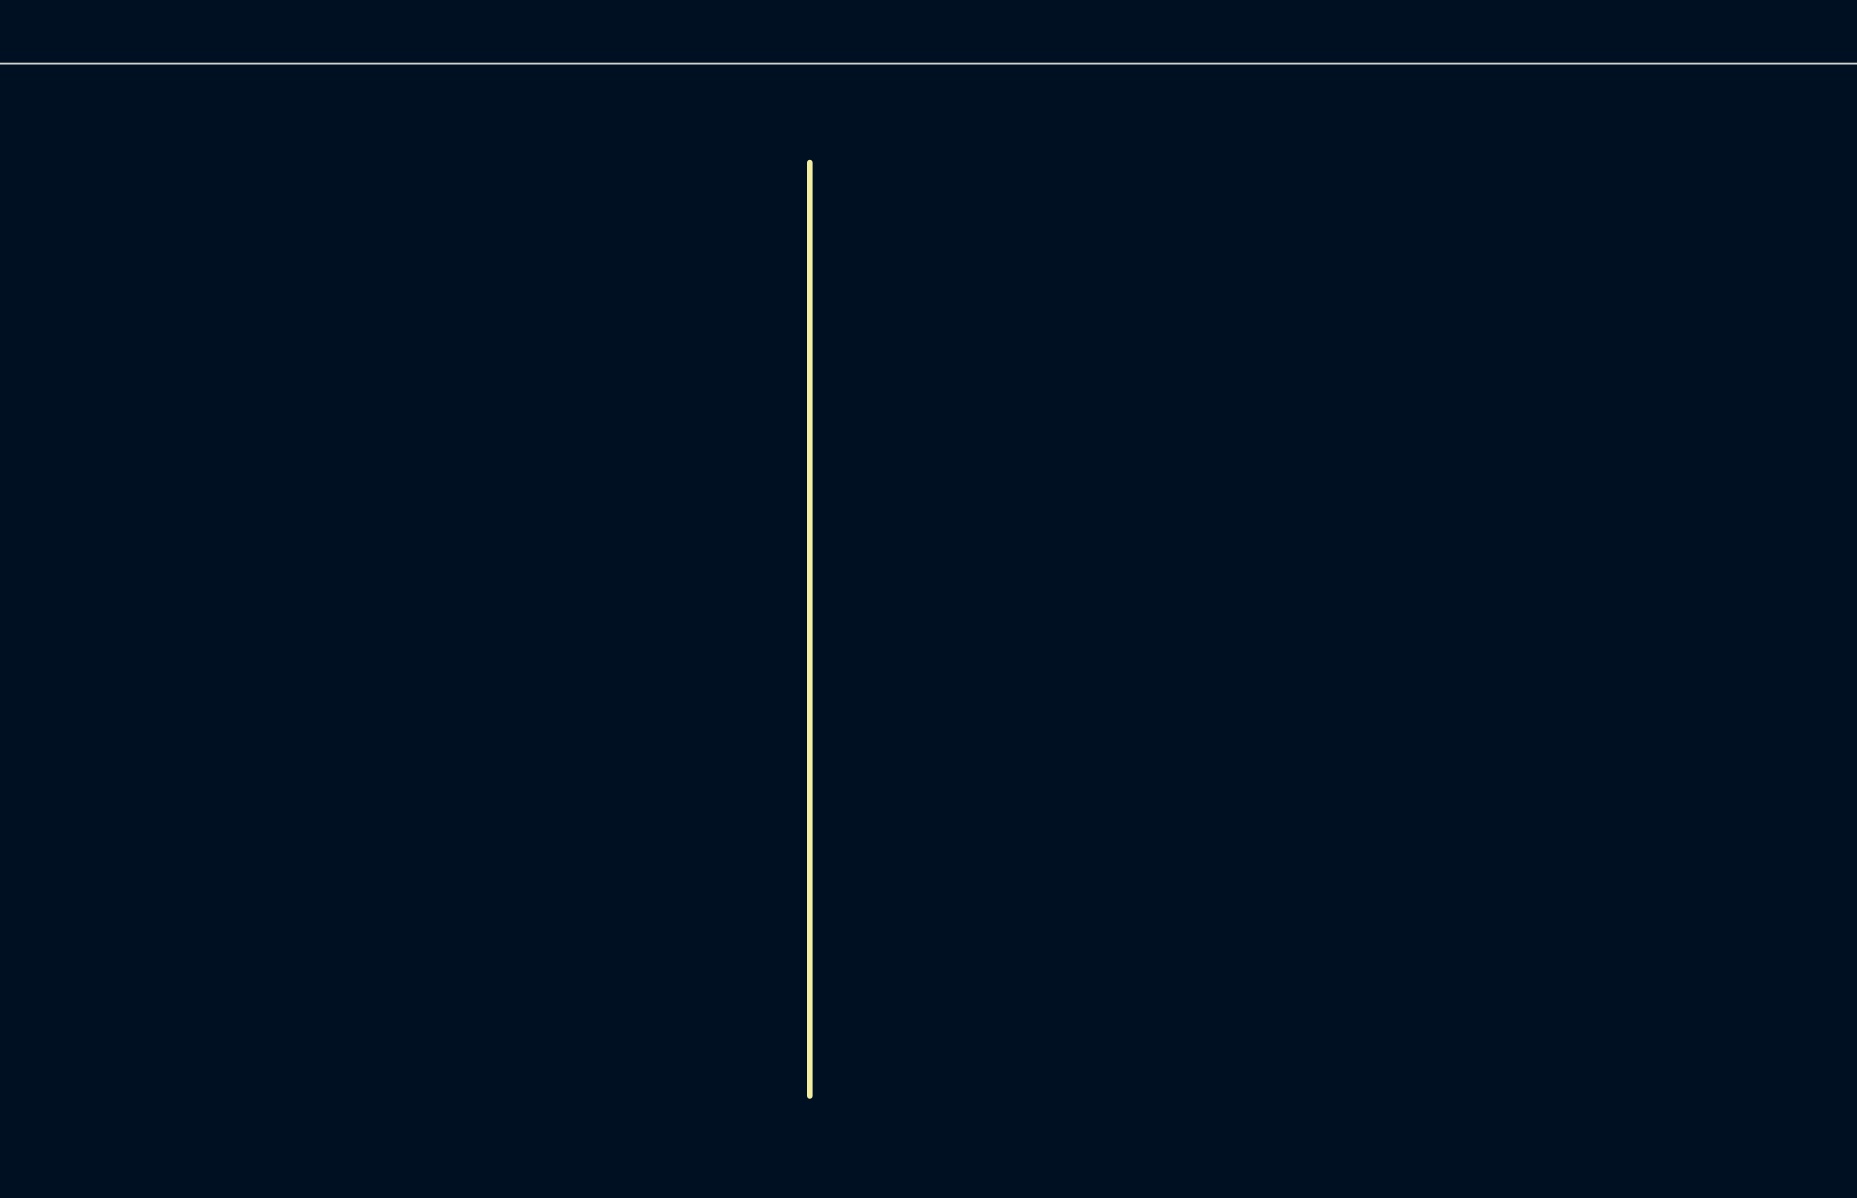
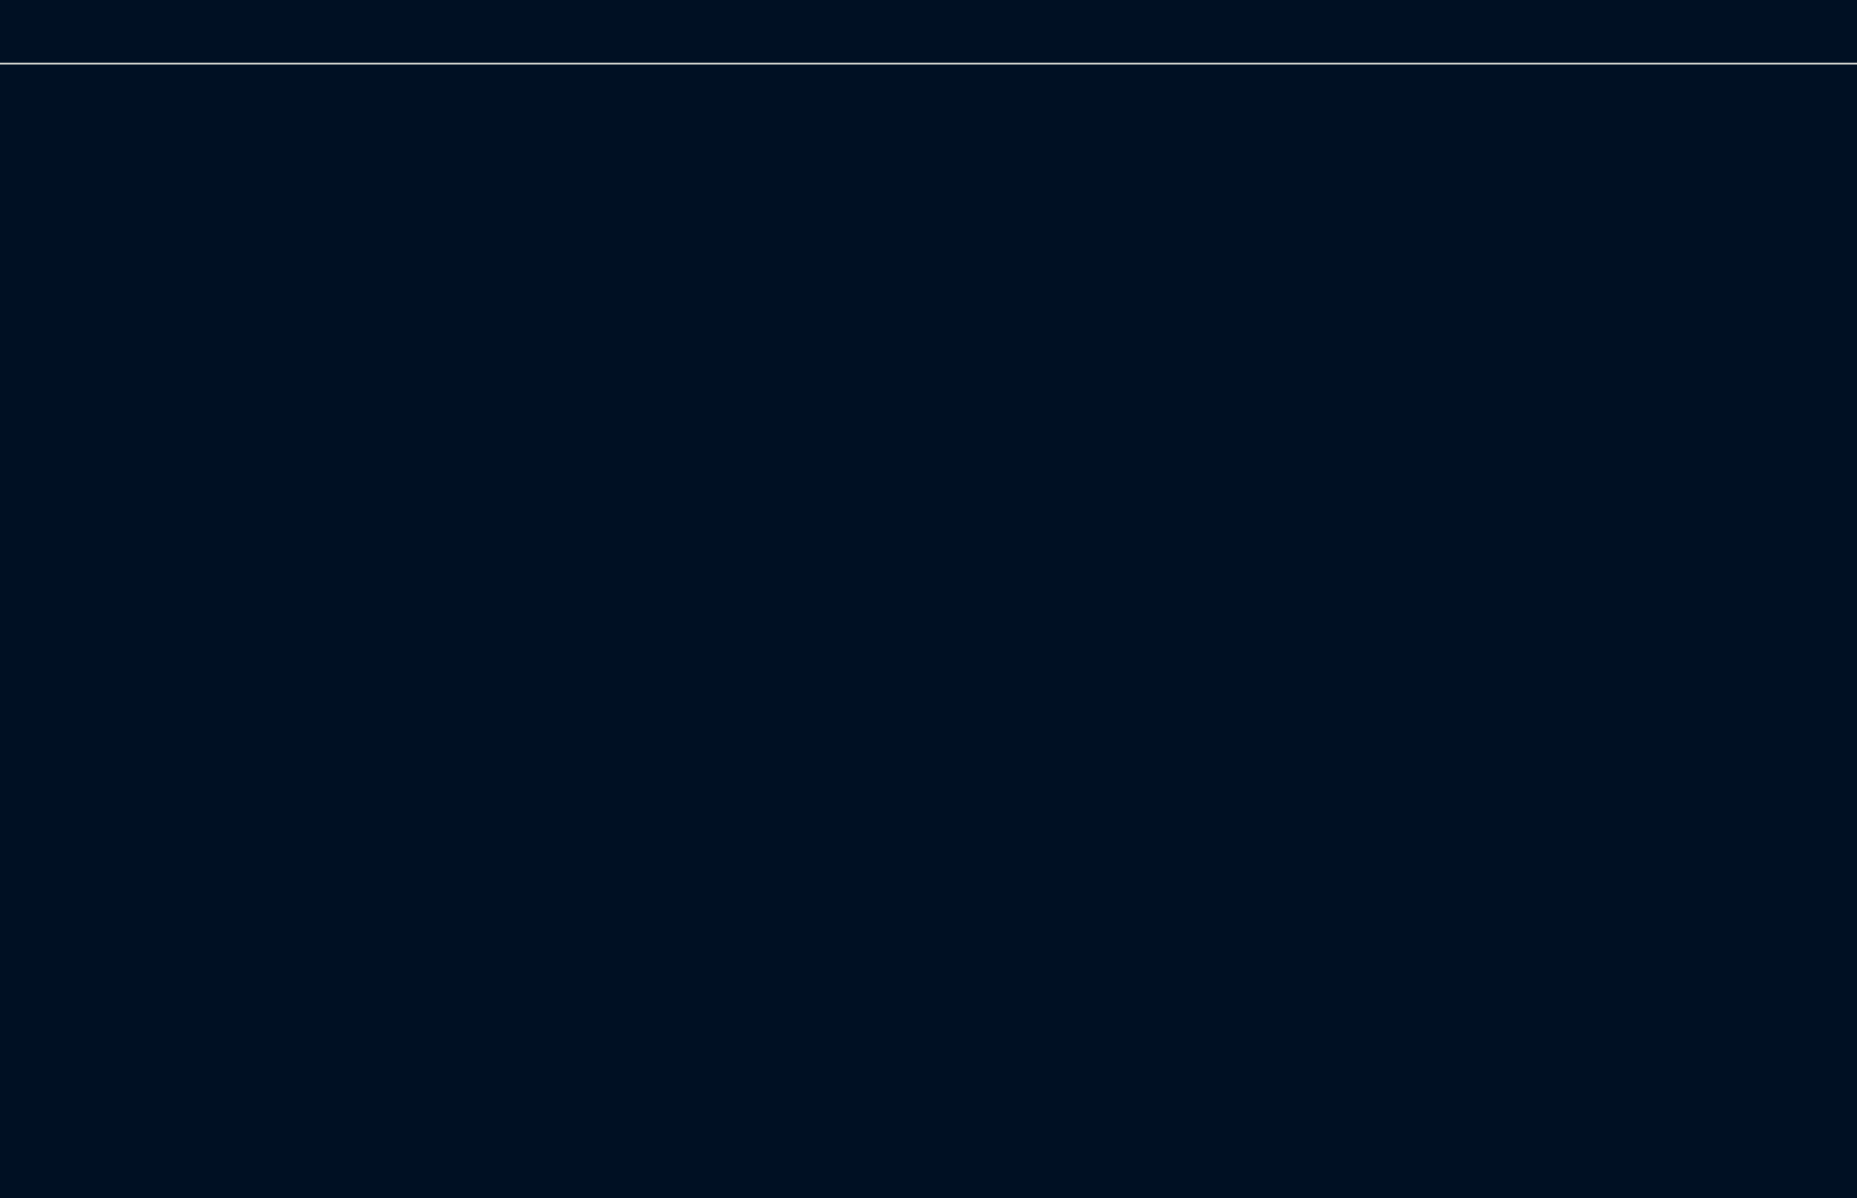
line: (809, 162) (809, 1095) -> none

